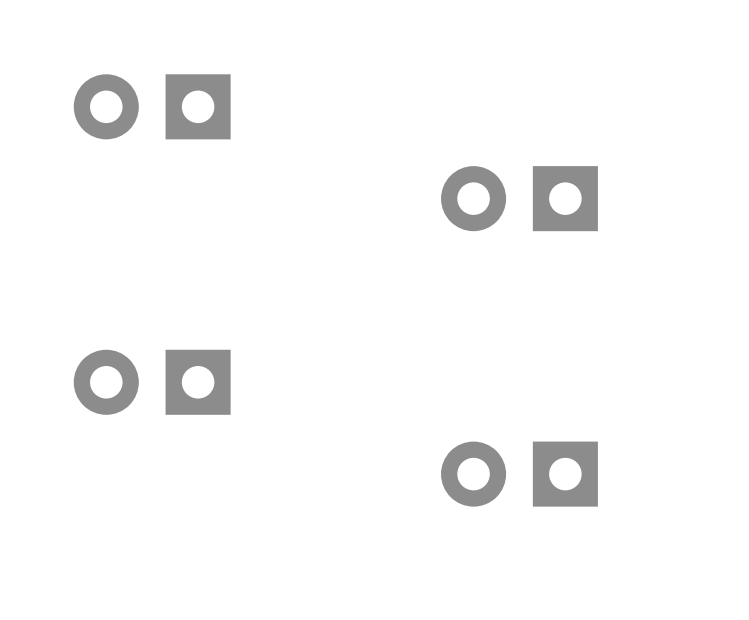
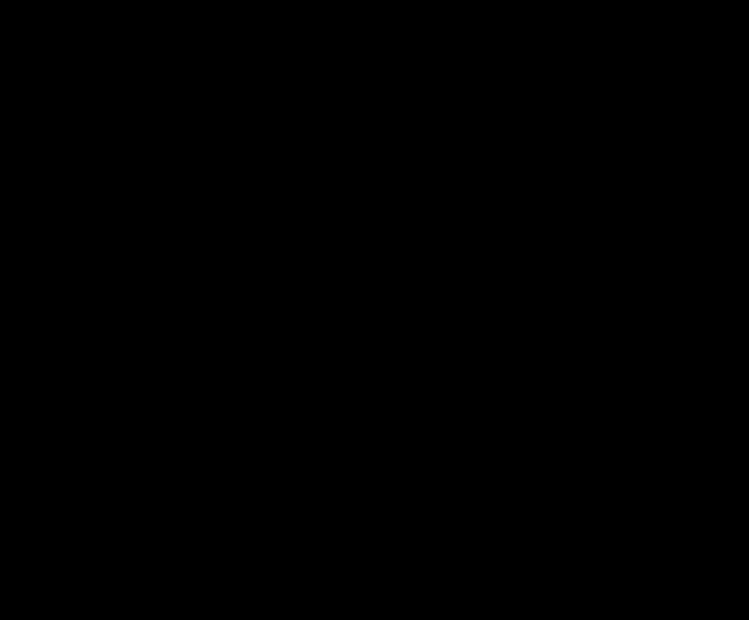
part: (152, 106) -> none
part: (519, 198) -> none
part: (152, 382) -> none
part: (519, 474) -> none

